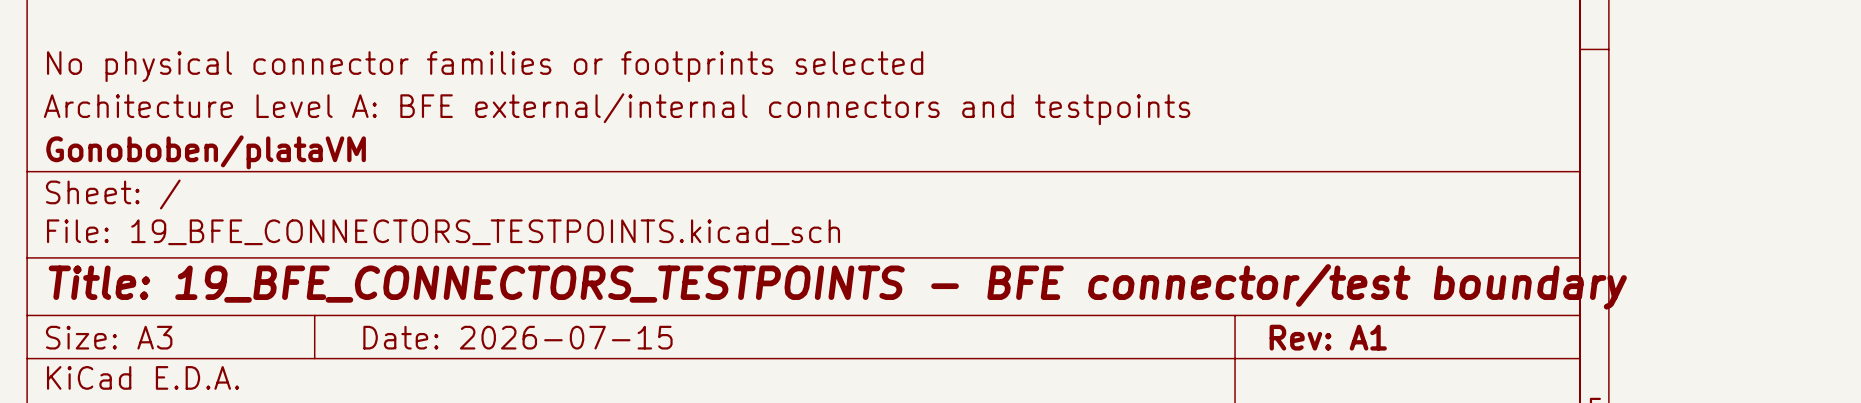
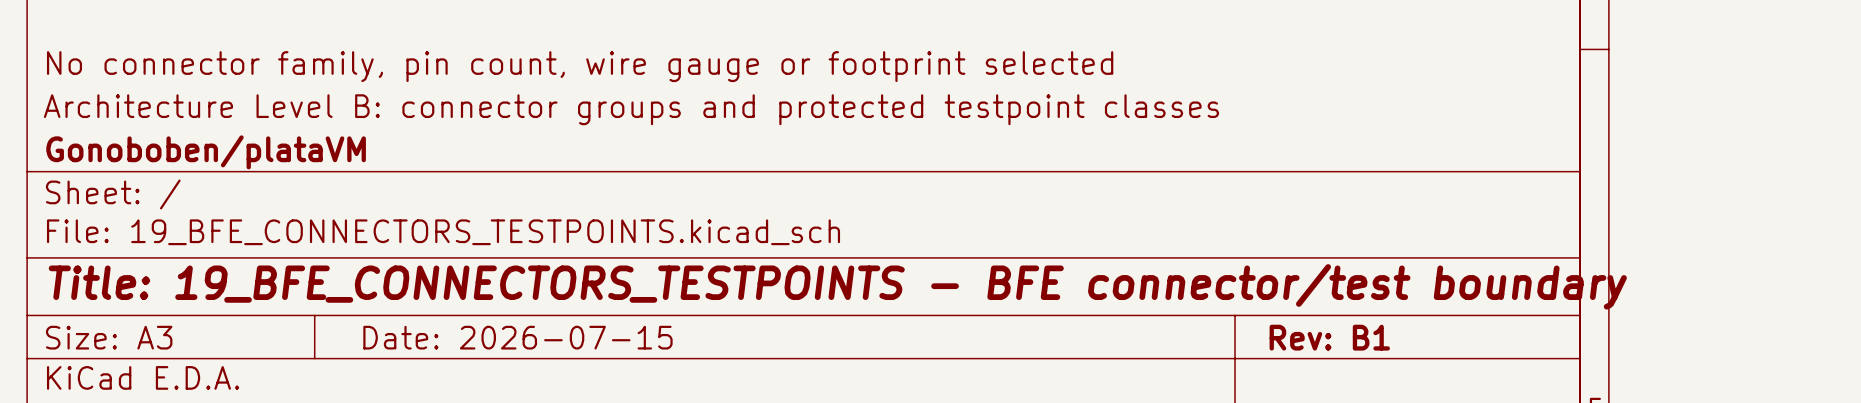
title block: No physical connector families or footprints selected (485, 66) -> No connector family, pin count, wire gauge or footprint selected (580, 66)
title block: Architecture Level A: BFE external/internal connectors and testpoints (617, 109) -> Architecture Level B: connector groups and protected testpoint classes (631, 109)
title block: Rev: A1 (1328, 337) -> Rev: B1 (1329, 337)

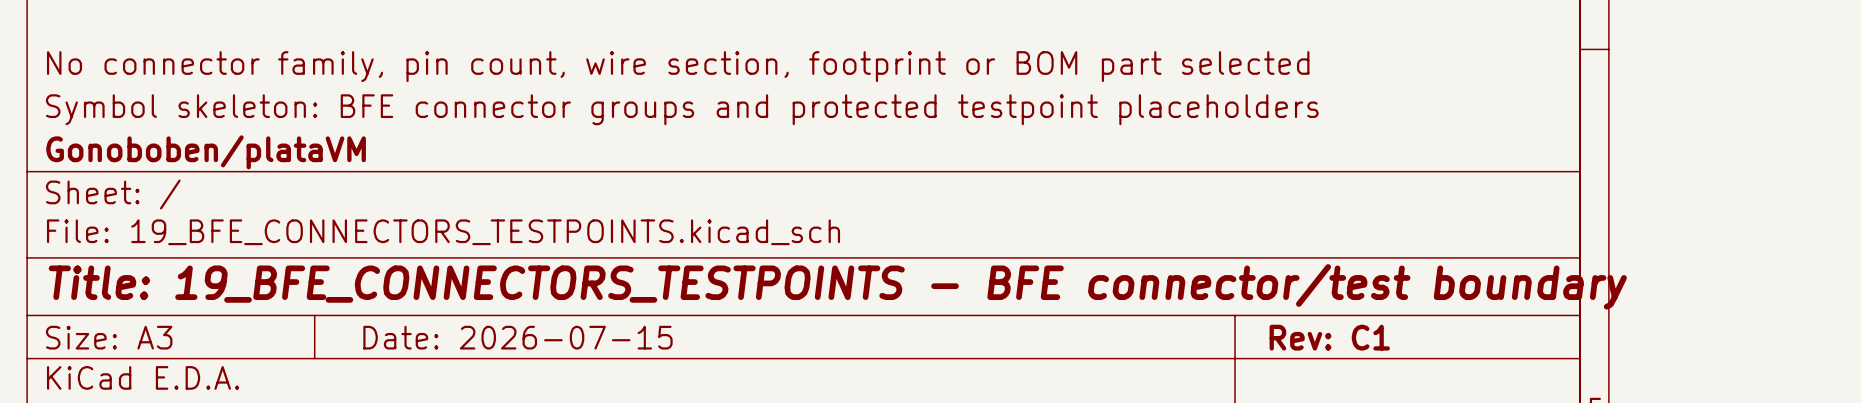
title block: No connector family, pin count, wire gauge or footprint selected (580, 66) -> No connector family, pin count, wire section, footprint or BOM part selected (678, 66)
title block: Architecture Level B: connector groups and protected testpoint classes (631, 109) -> Symbol skeleton: BFE connector groups and protected testpoint placeholders (682, 109)
title block: Rev: B1 (1329, 337) -> Rev: C1 (1329, 337)

